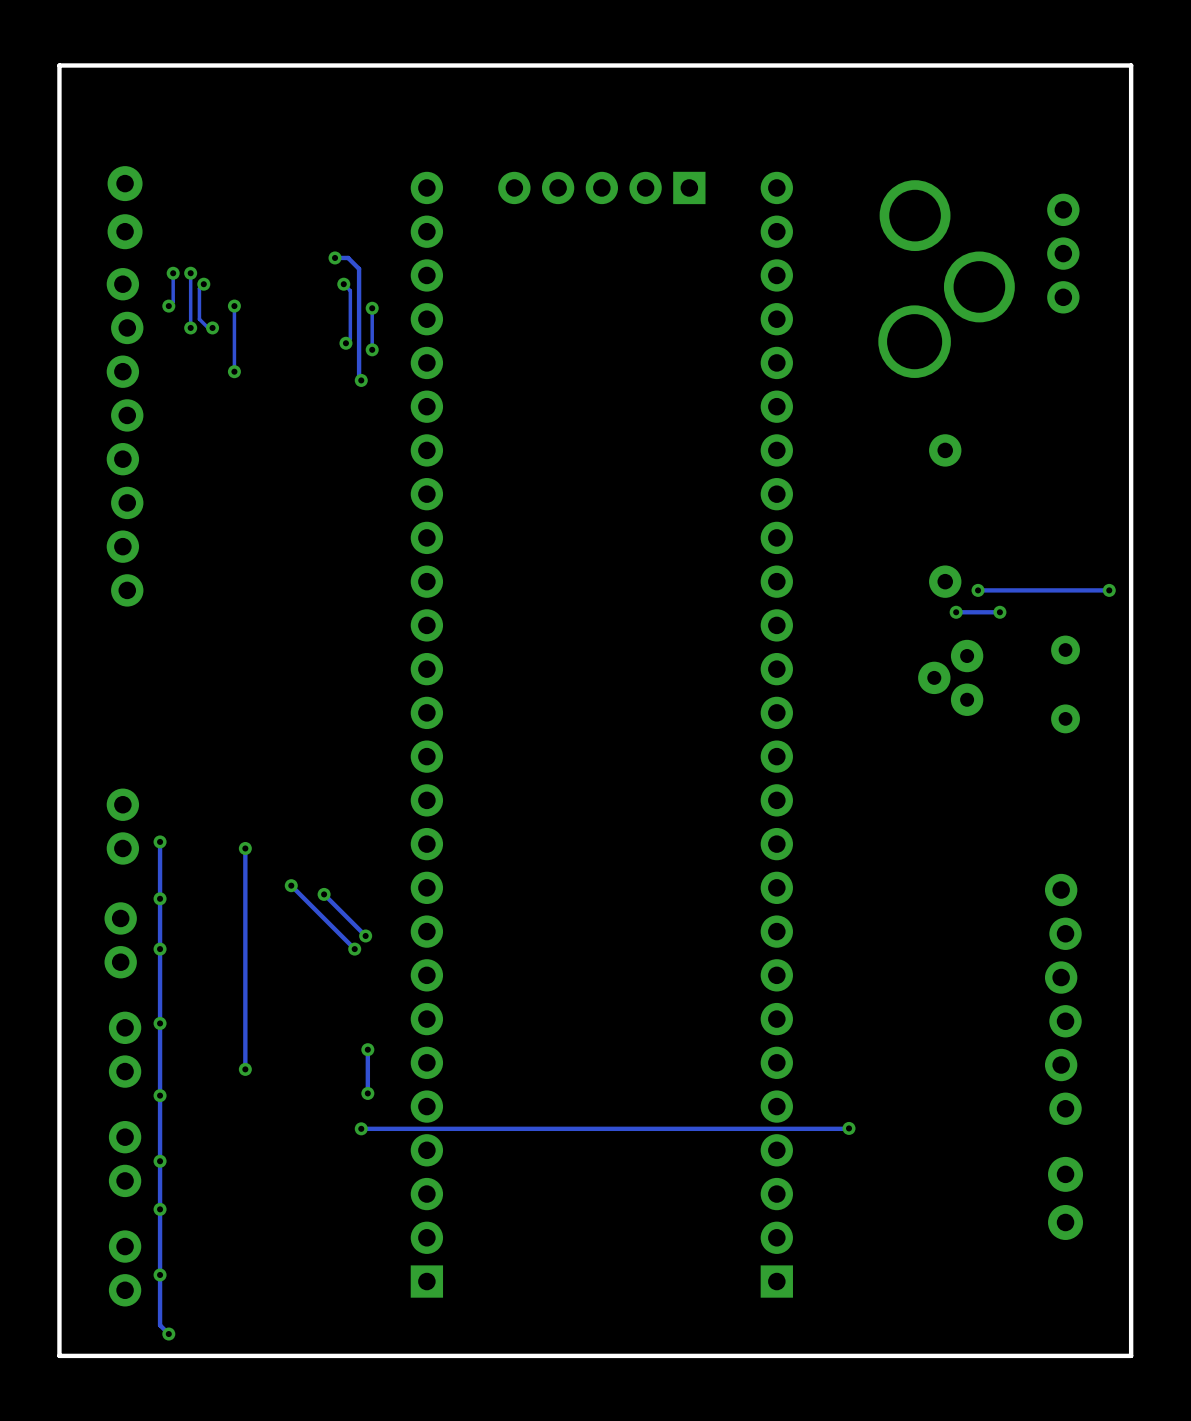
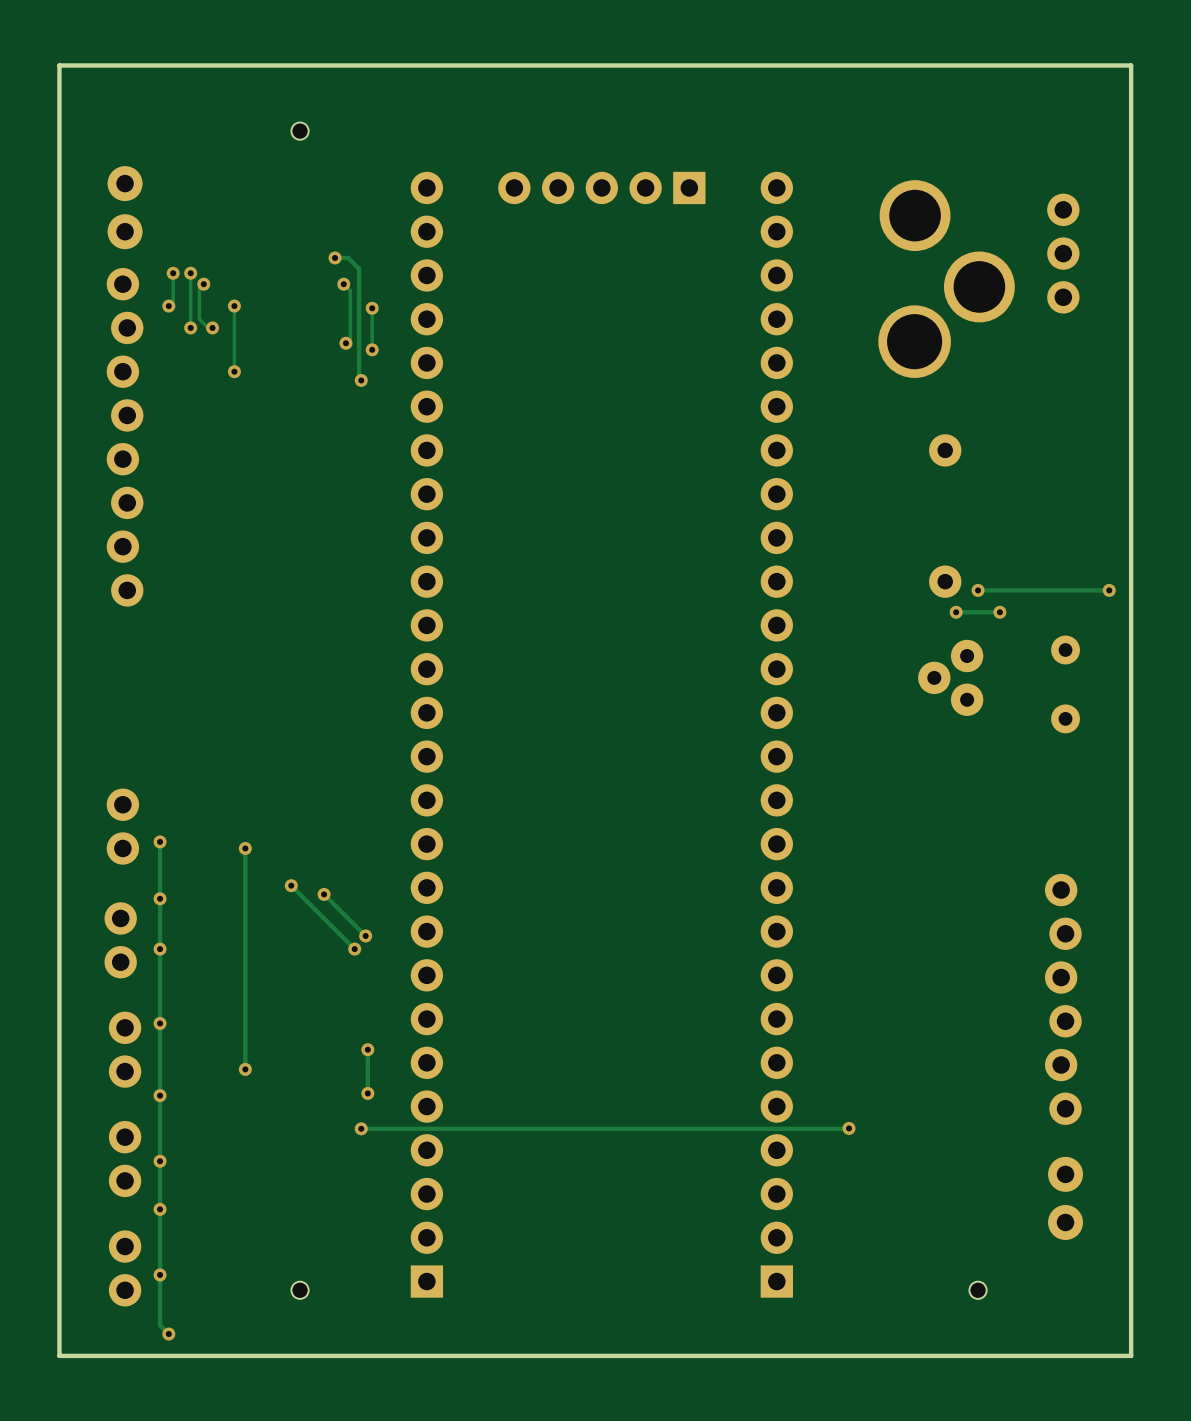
hole: none -> (300, 131)
hole: none -> (300, 1290)
hole: none -> (978, 1290)

